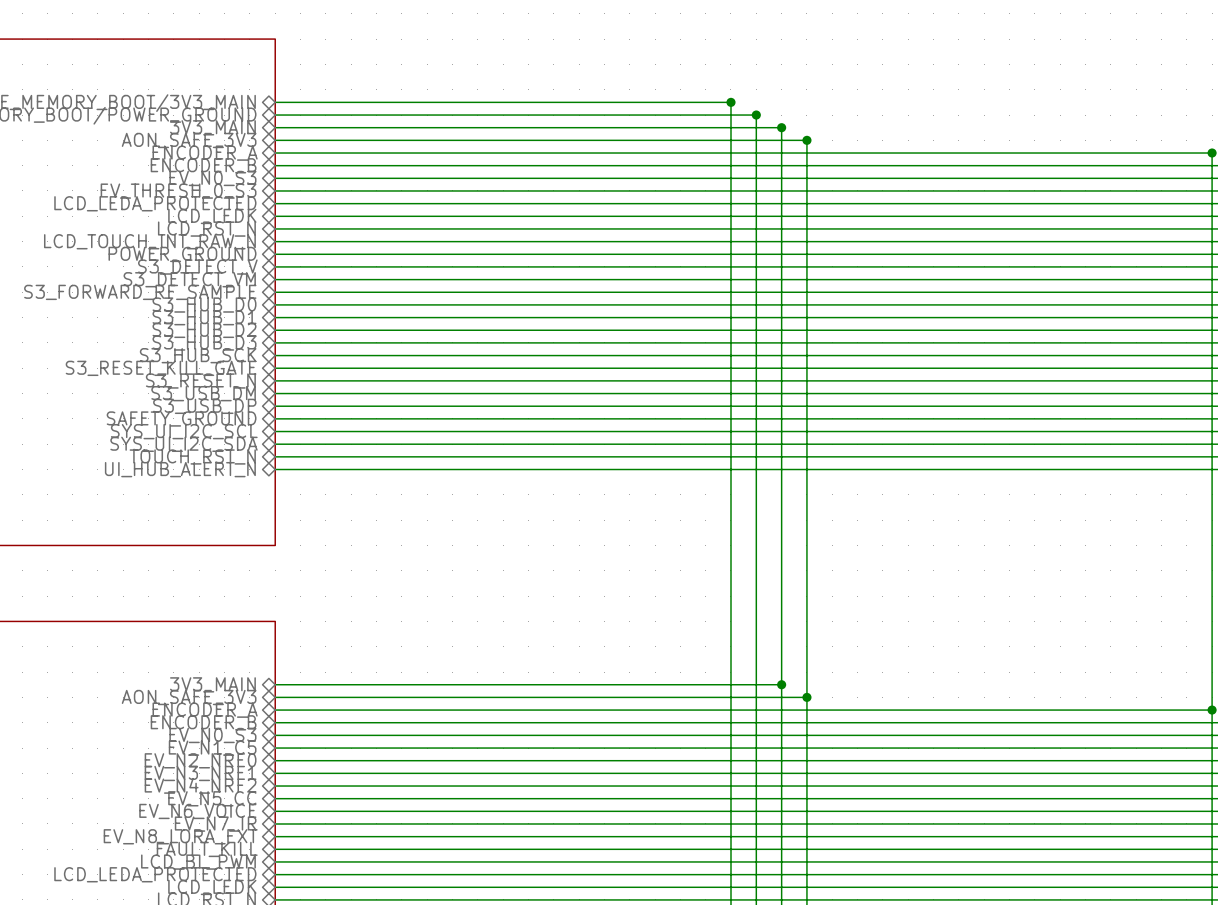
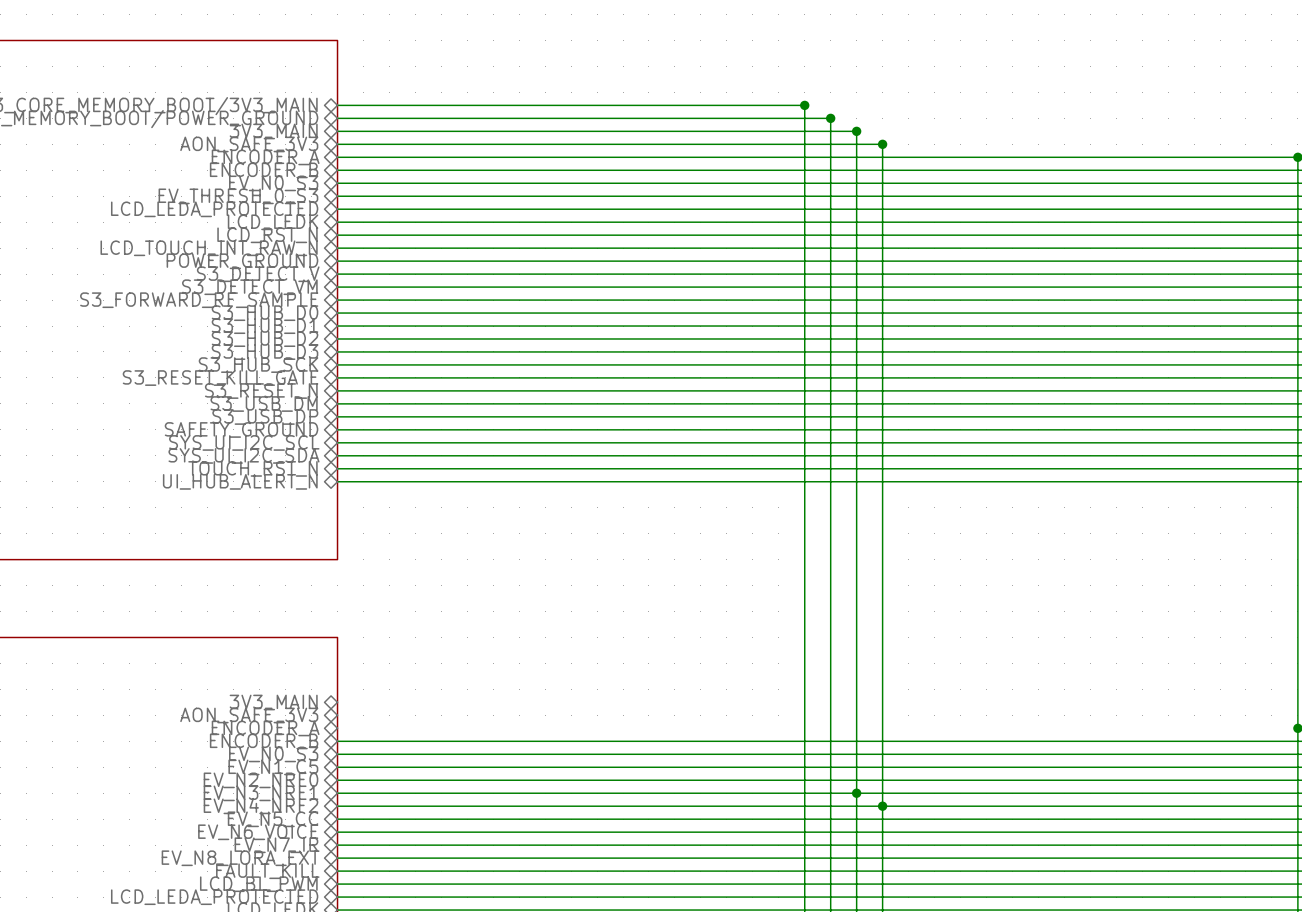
wire: (275, 684) (781, 684) -> none
junction: (781, 684) -> none
wire: (275, 697) (806, 697) -> none
junction: (806, 697) -> none
wire: (275, 710) (1212, 710) -> none
junction: none -> (856, 793)
junction: none -> (882, 806)

